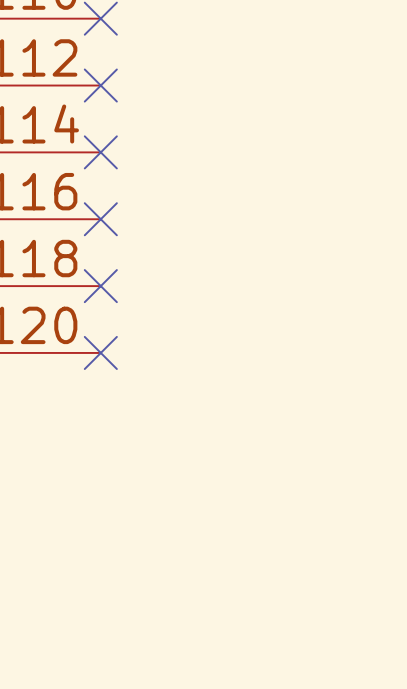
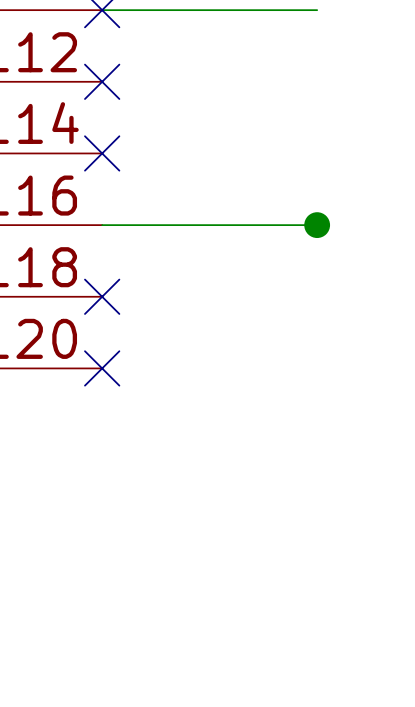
wire: none -> (102, 10) (317, 10)
wire: none -> (102, 225) (317, 225)
no-connect mark: (100, 219) -> none
junction: none -> (317, 225)

